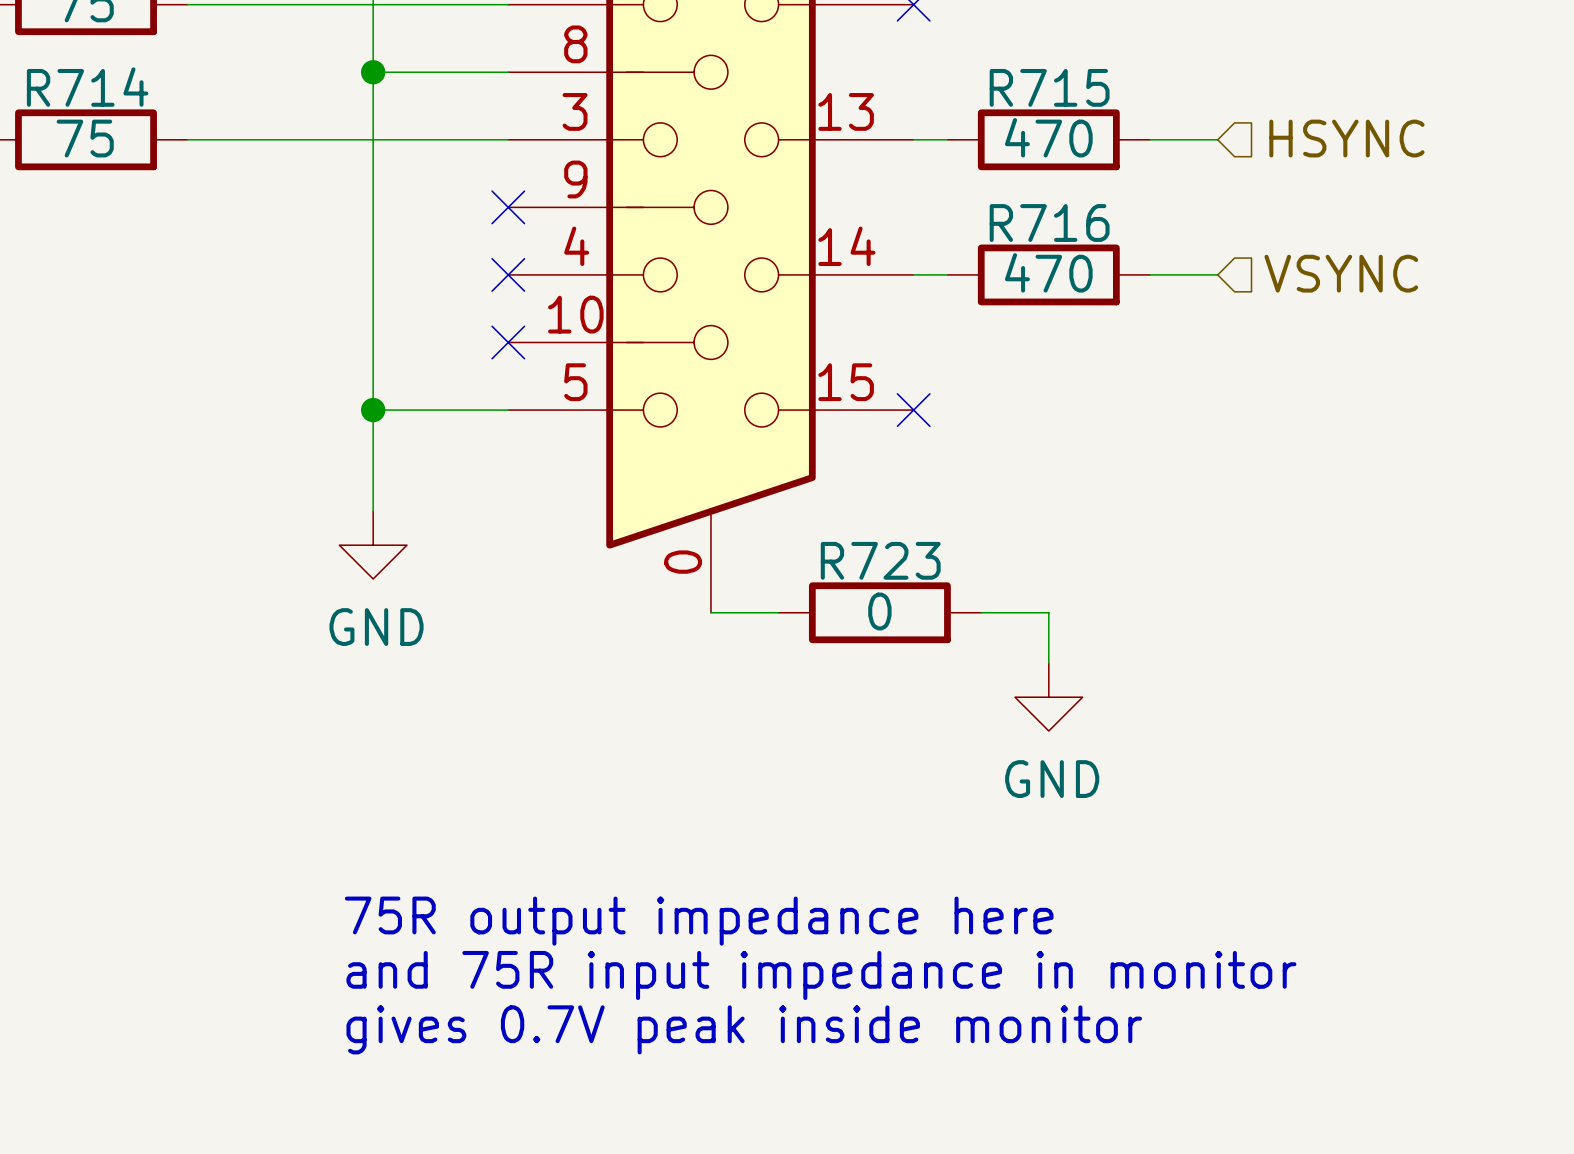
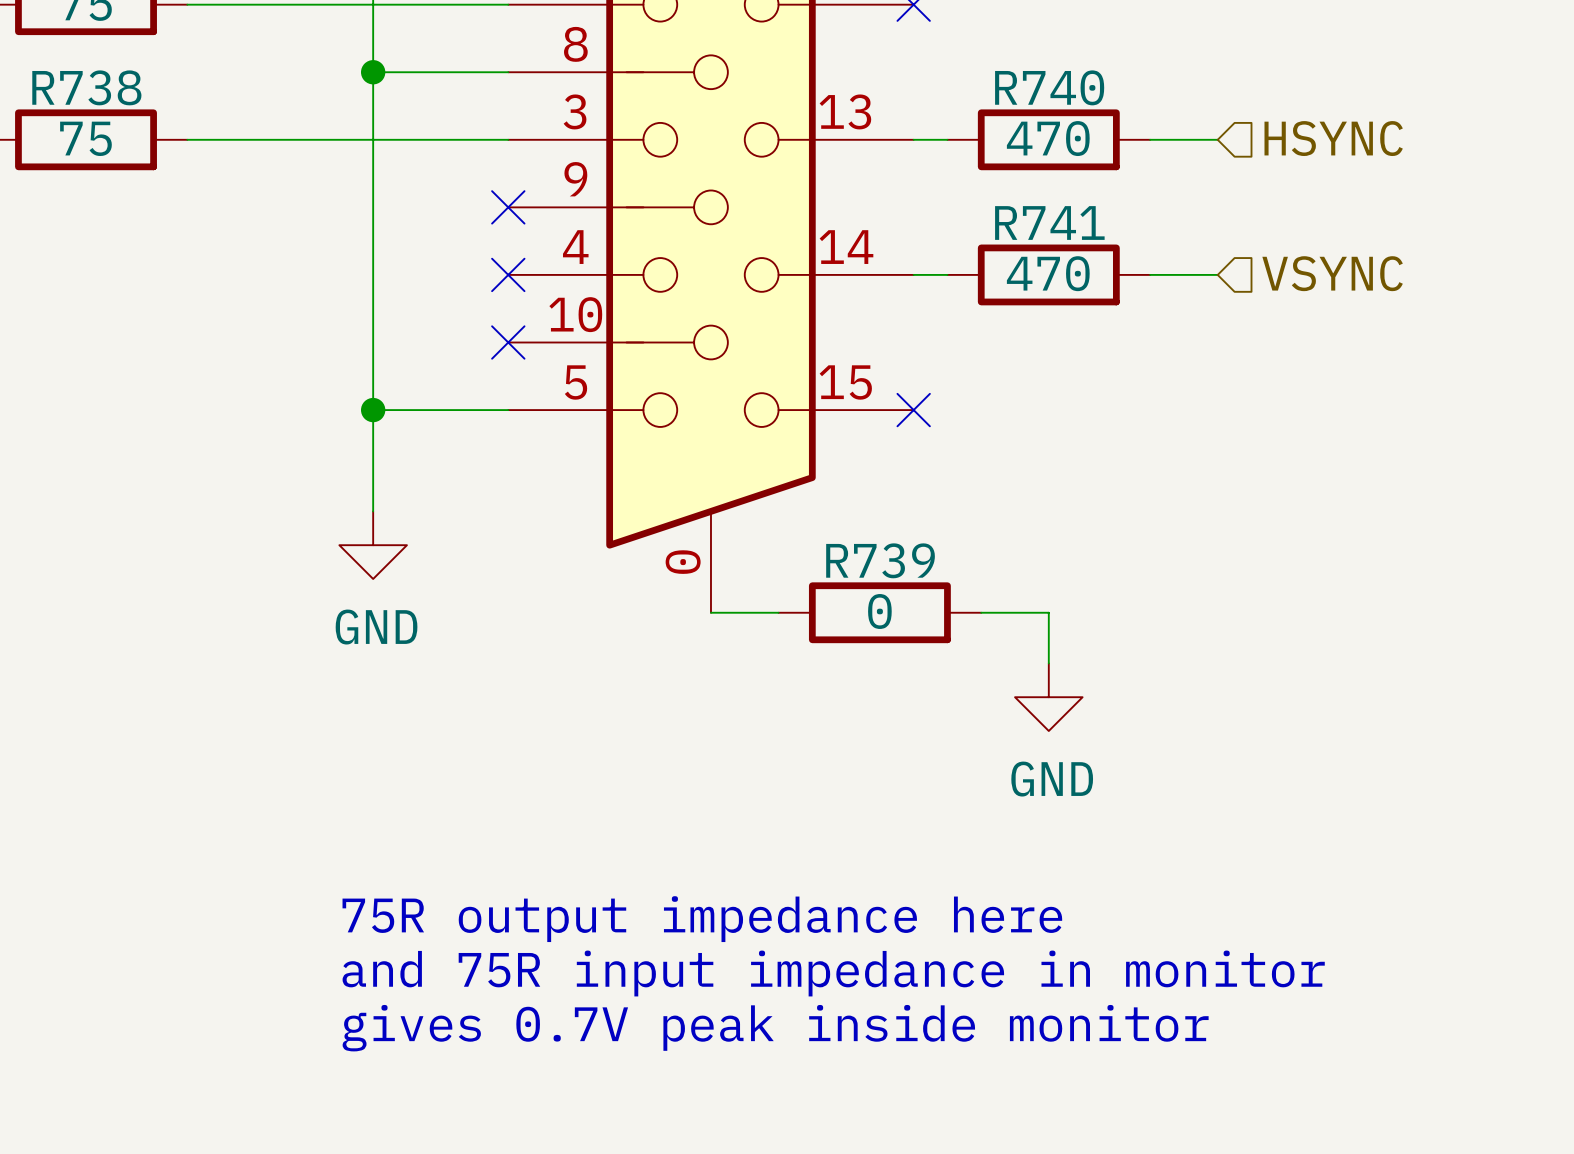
R714 name: R714 (87, 87) -> R738 (86, 87)
R715 name: R715 (1049, 87) -> R740 (1049, 87)
R716 name: R716 (1049, 223) -> R741 (1049, 223)
R723 name: R723 (880, 560) -> R739 (880, 560)

